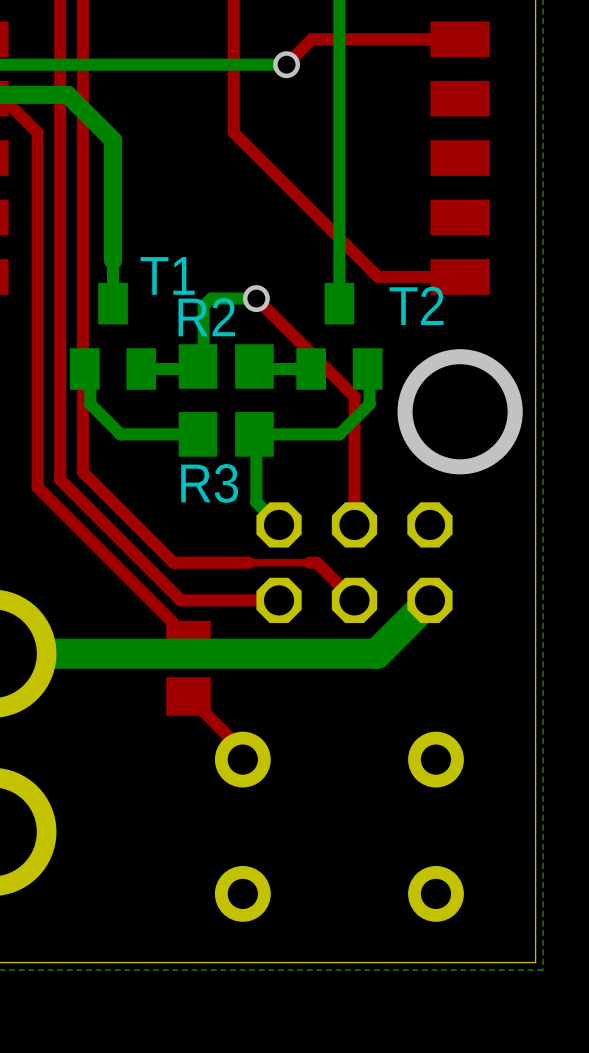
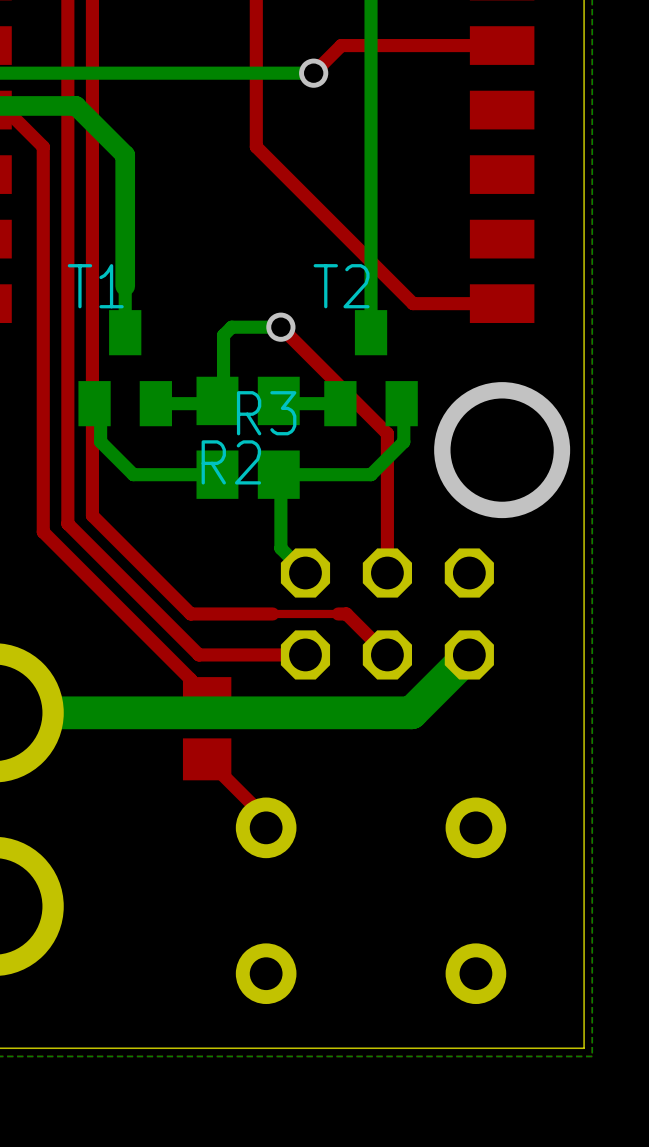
T1 name position: T1 (167, 275) -> T1 (95, 286)
T2 name position: T2 (416, 305) -> T2 (341, 286)
R2 name position: R2 (206, 317) -> R2 (231, 462)
R3 name position: R3 (209, 483) -> R3 (266, 413)

